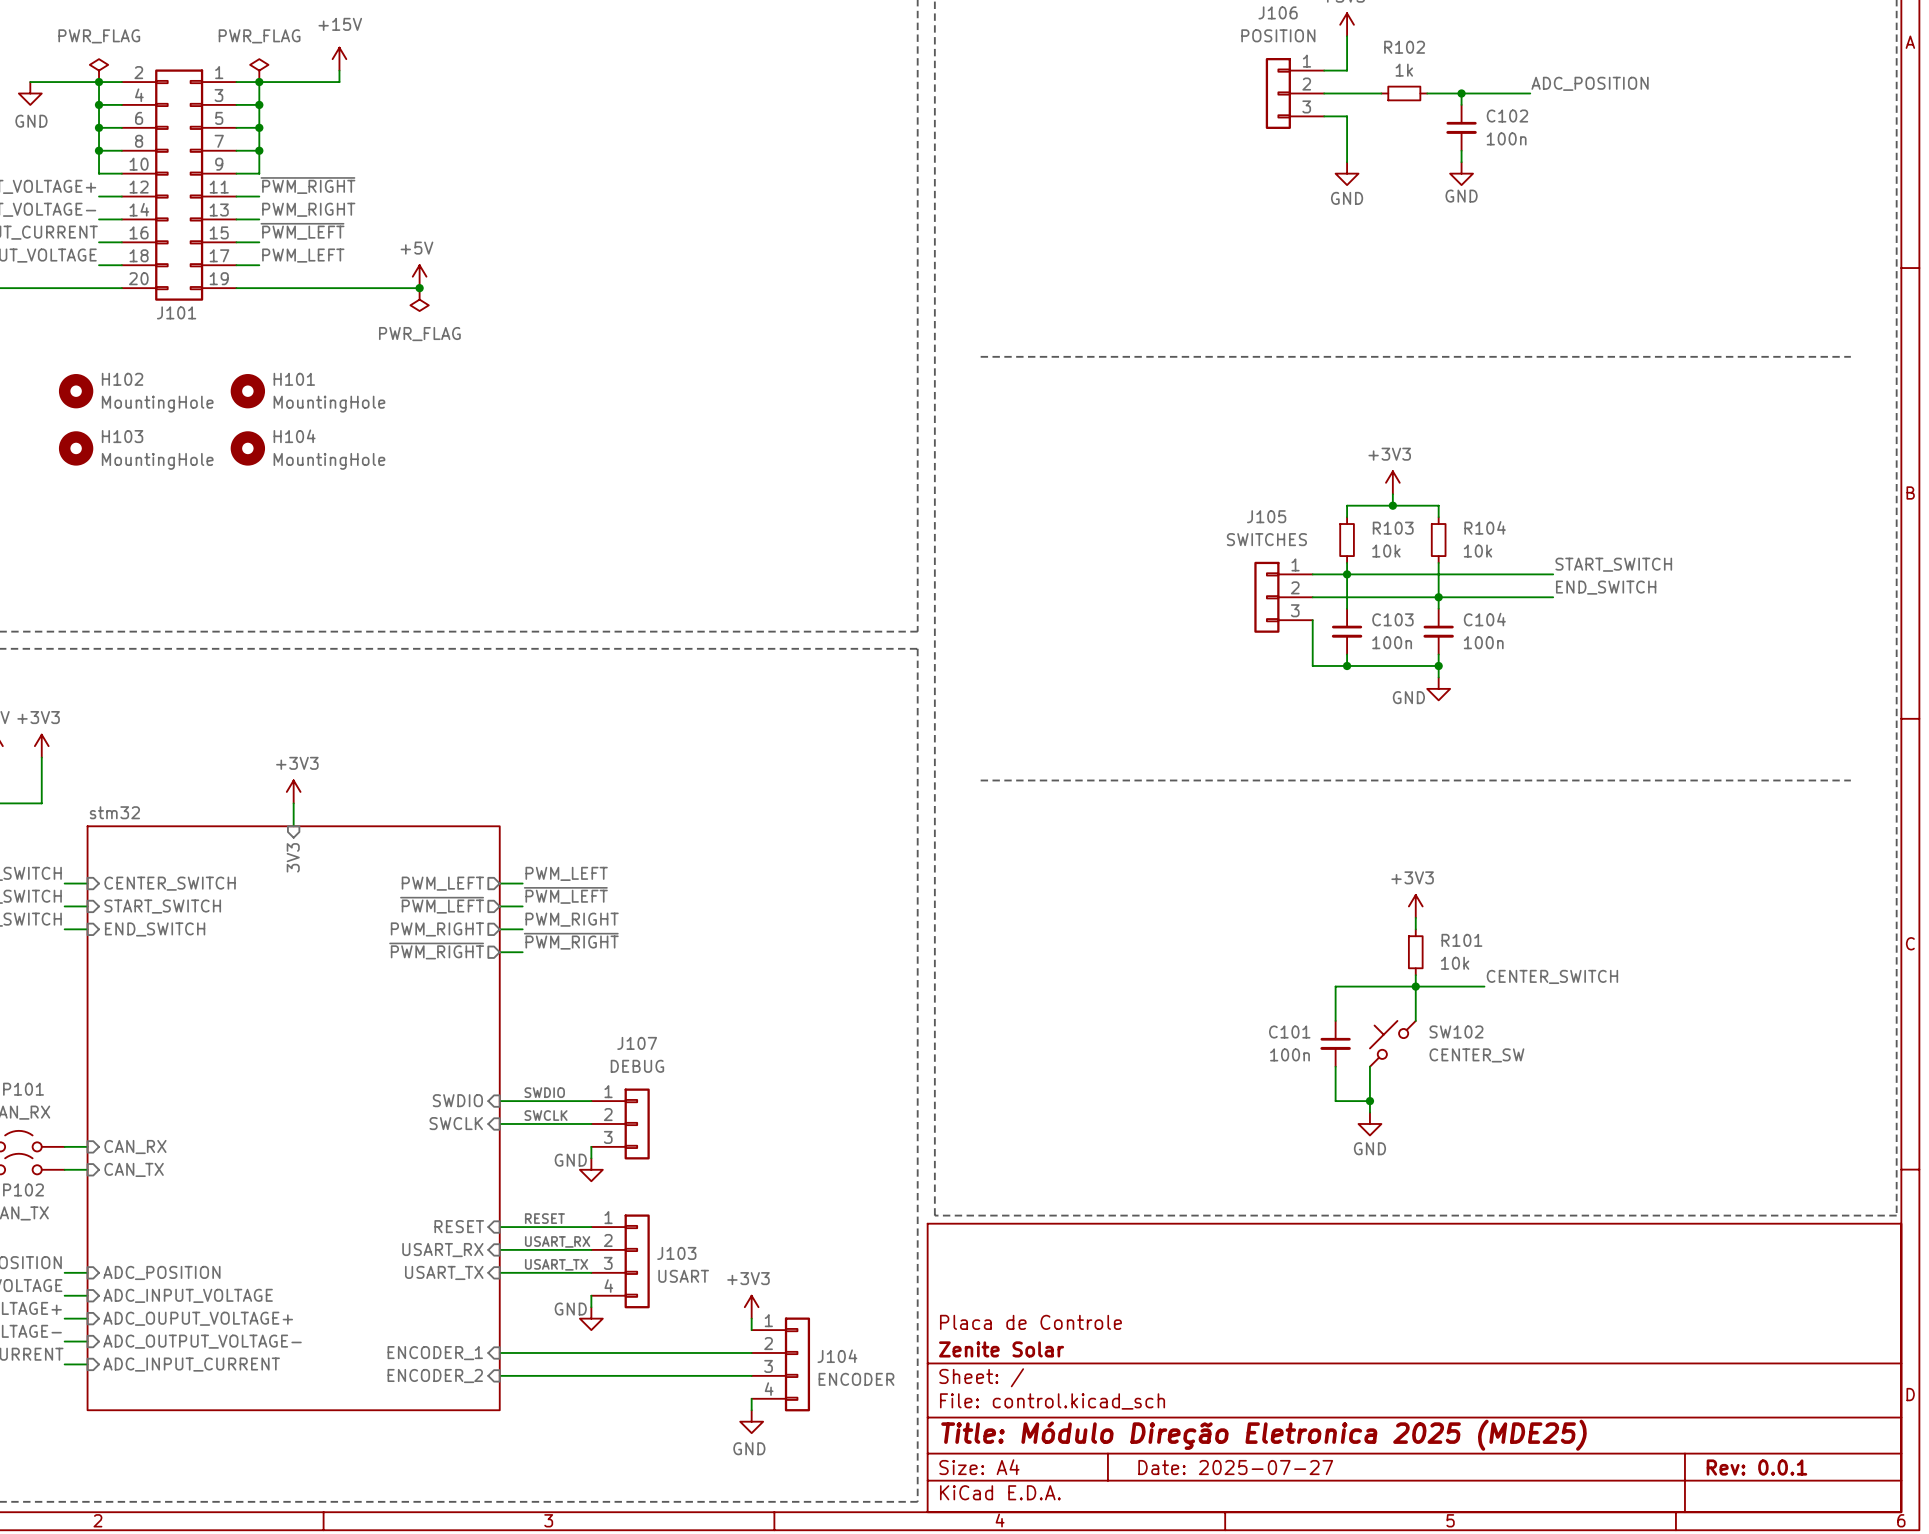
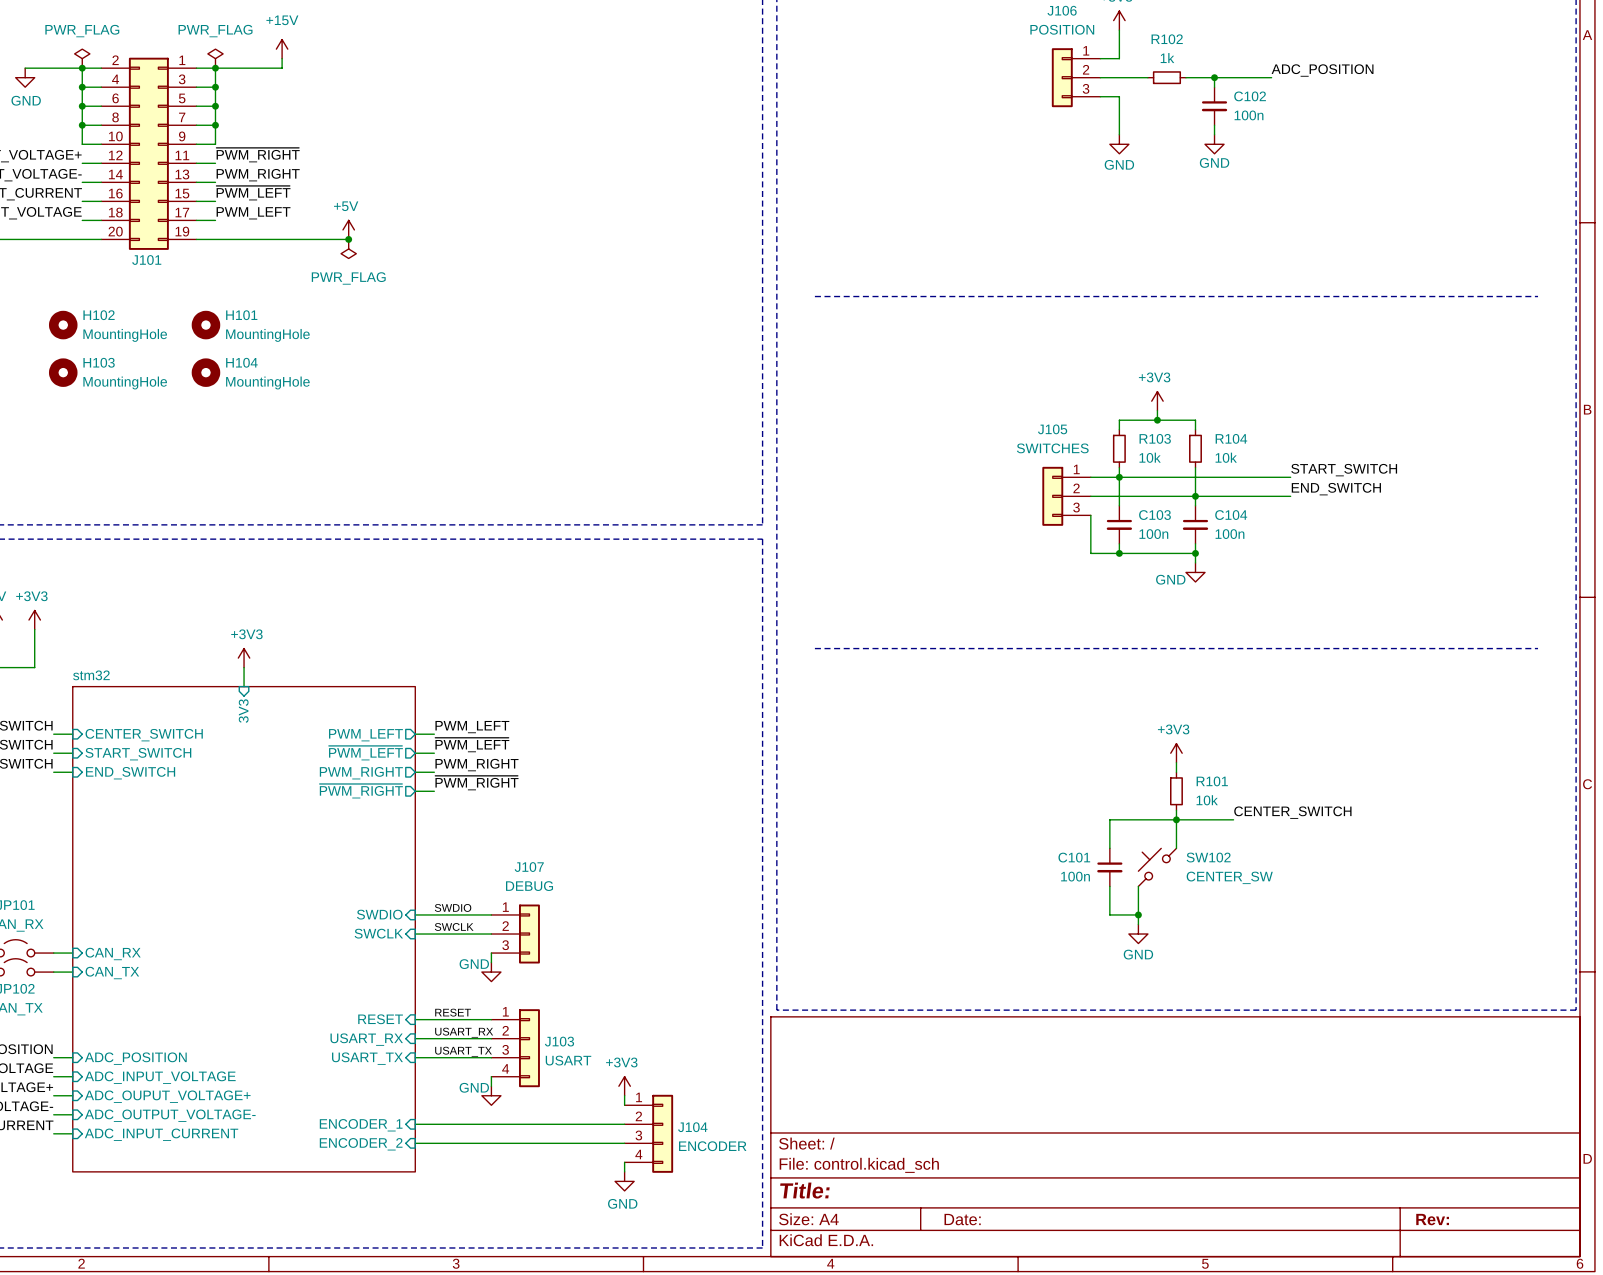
title block: Placa de Controle (1030, 1322) -> none
title block: Zenite Solar (1001, 1349) -> none
title block: Title: Módulo Direção Eletronica 2025 (MDE25) (1263, 1435) -> Title: (804, 1190)
title block: Date: 2025-07-27 (1235, 1467) -> Date: (962, 1219)
title block: Rev: 0.0.1 (1756, 1467) -> Rev: (1432, 1219)

